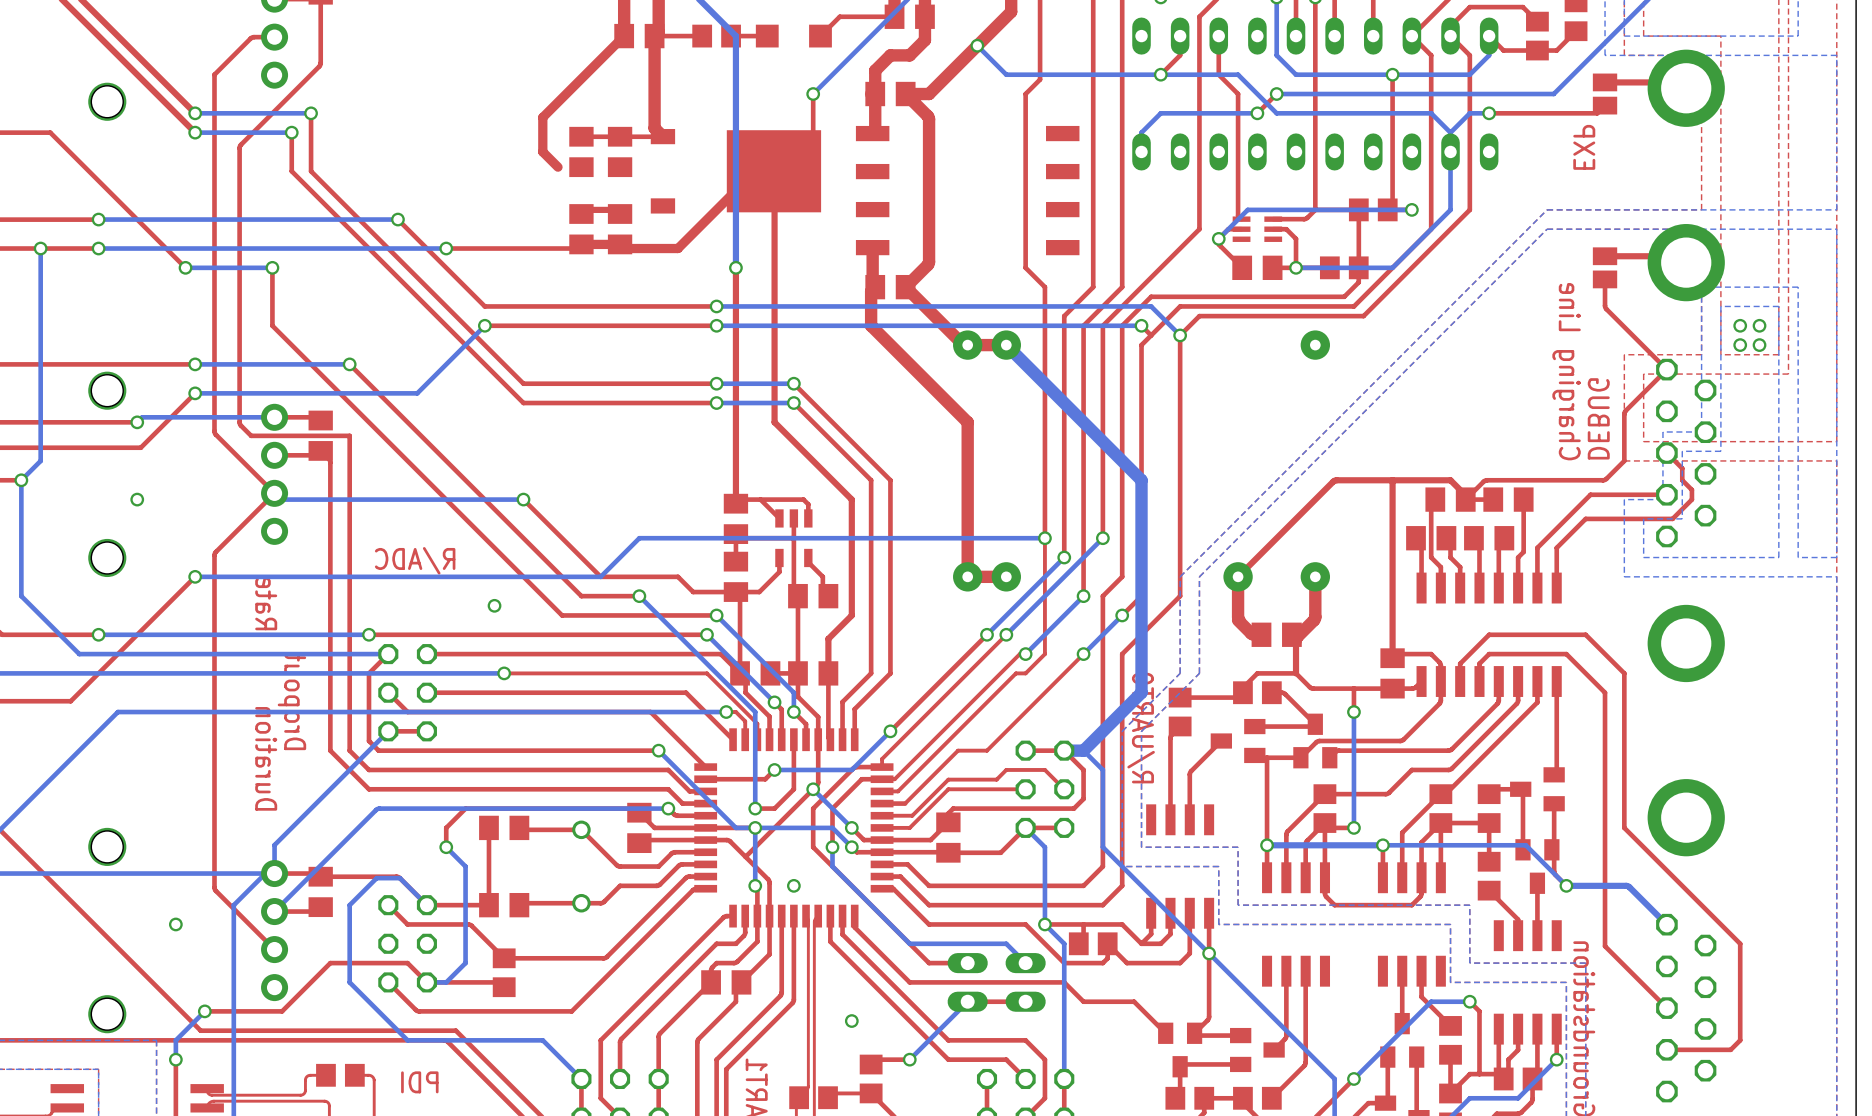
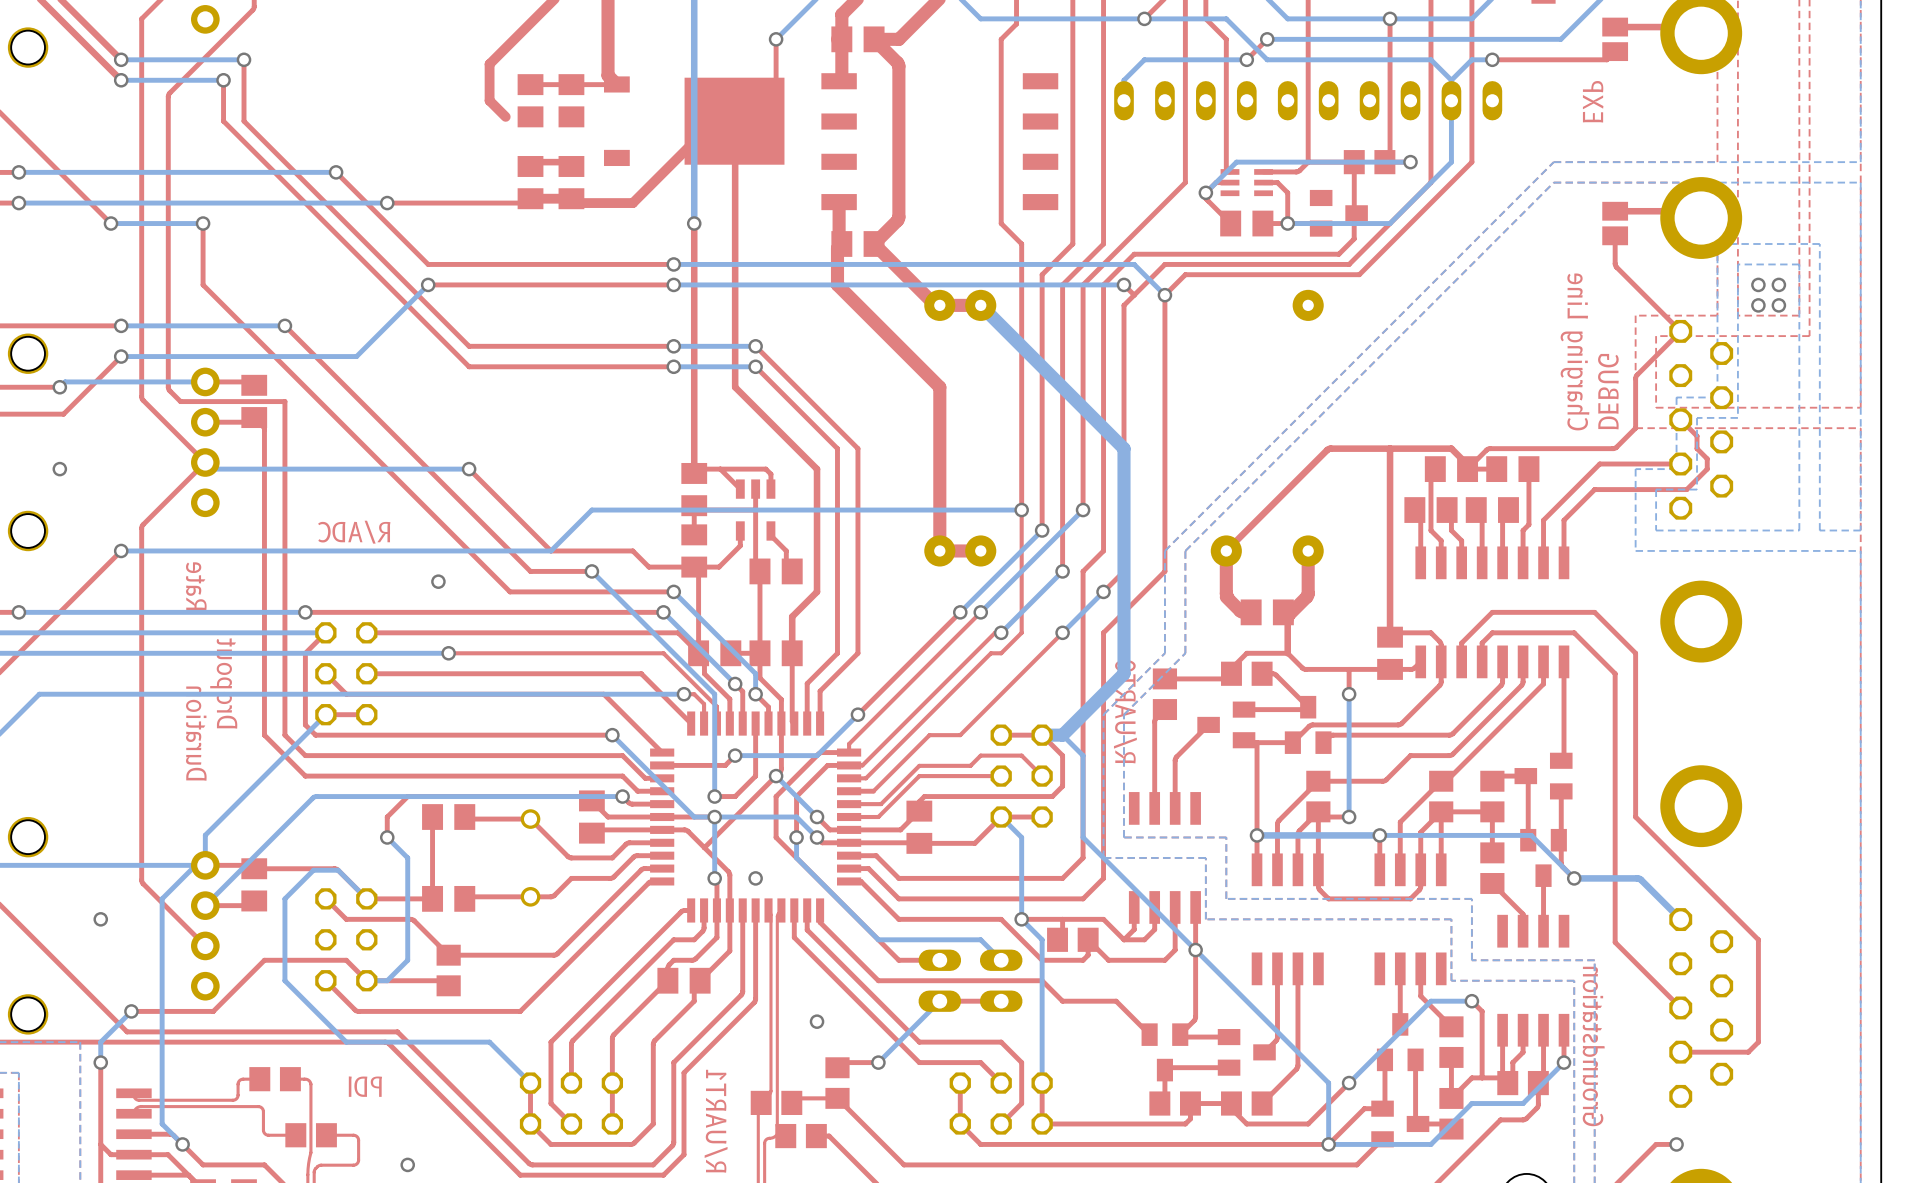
part footprint: [1319, 256, 1369, 280] -> [1309, 189, 1368, 237]

